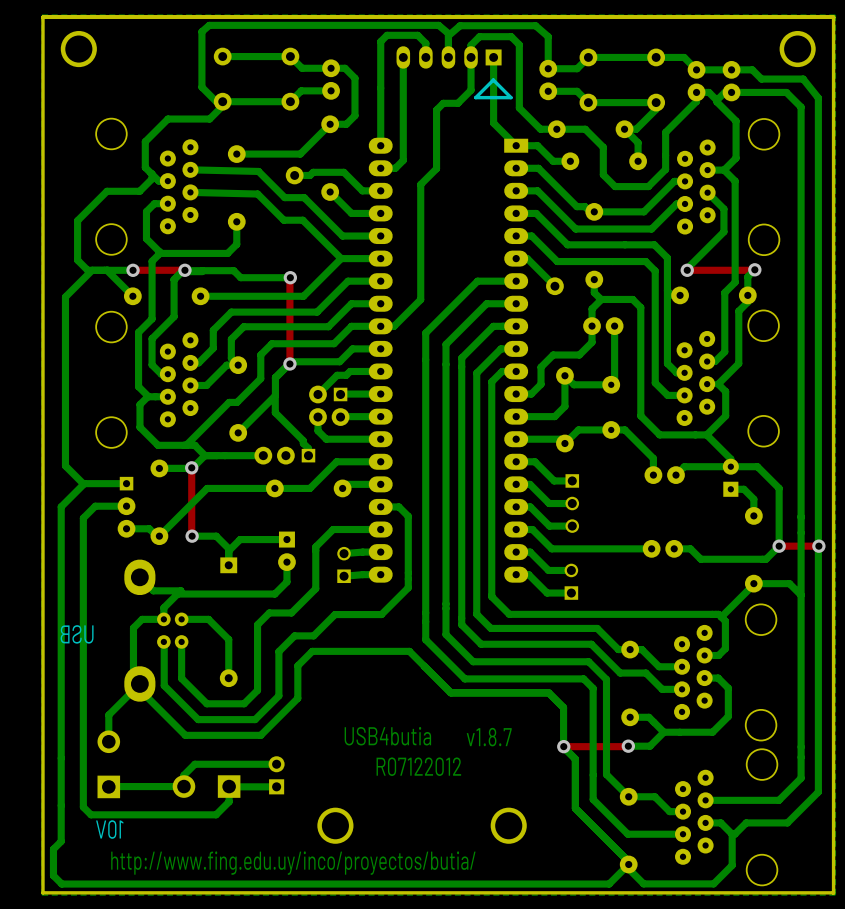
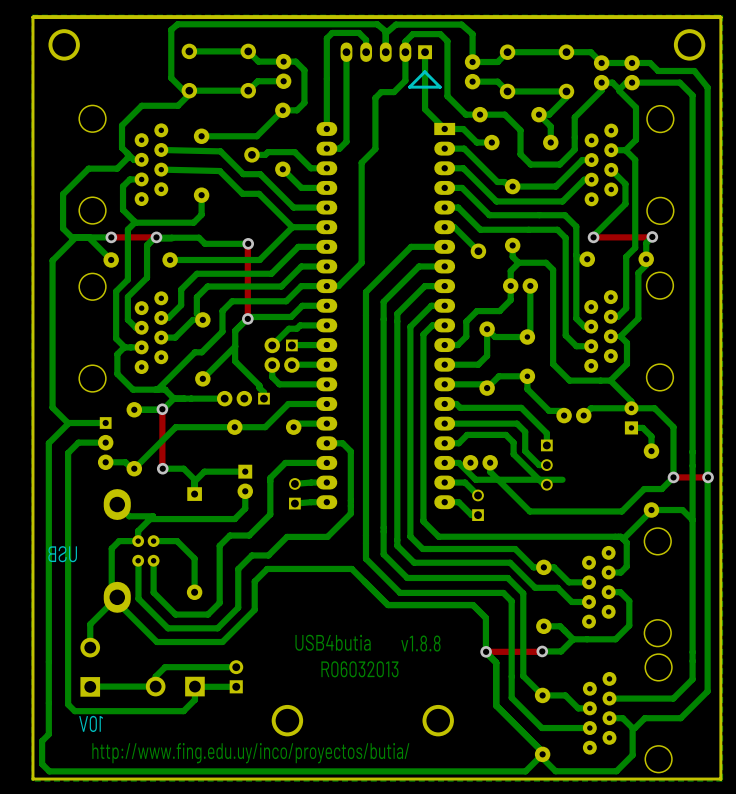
bottom track: (611, 429) (624, 429) (653, 458) (653, 475) -> (527, 376) (527, 389) (549, 410) (564, 410)
bottom track: (529, 461) (534, 461) (554, 480) (572, 480) -> (456, 403) (460, 407) (521, 407) (546, 433) (546, 445)
bottom track: (530, 484) (549, 503) (572, 503) -> (456, 423) (517, 423) (525, 431) (525, 451) (539, 465) (546, 465)
part position: (572, 503) -> (546, 465)
bottom track: (530, 506) (549, 526) (572, 526) -> (457, 443) (467, 434) (505, 434) (513, 442) (513, 454) (544, 484) (546, 484)
part position: (662, 548) -> (480, 462)
bottom track: (674, 548) (690, 548) (700, 559) (766, 559) -> (490, 462) (490, 471) (529, 511) (621, 511) (644, 489) (662, 488)
bottom track: (530, 552) (548, 570) (571, 570) -> (456, 482) (465, 482) (478, 495)
bottom track: (528, 574) (547, 593) (571, 593) -> (455, 502) (458, 502) (471, 515) (478, 515)
part position: (571, 581) -> (478, 505)
text: v1.8.7 (489, 737) -> v1.8.8 (420, 643)
text: R07122012 (418, 766) -> R06032013 (359, 669)

